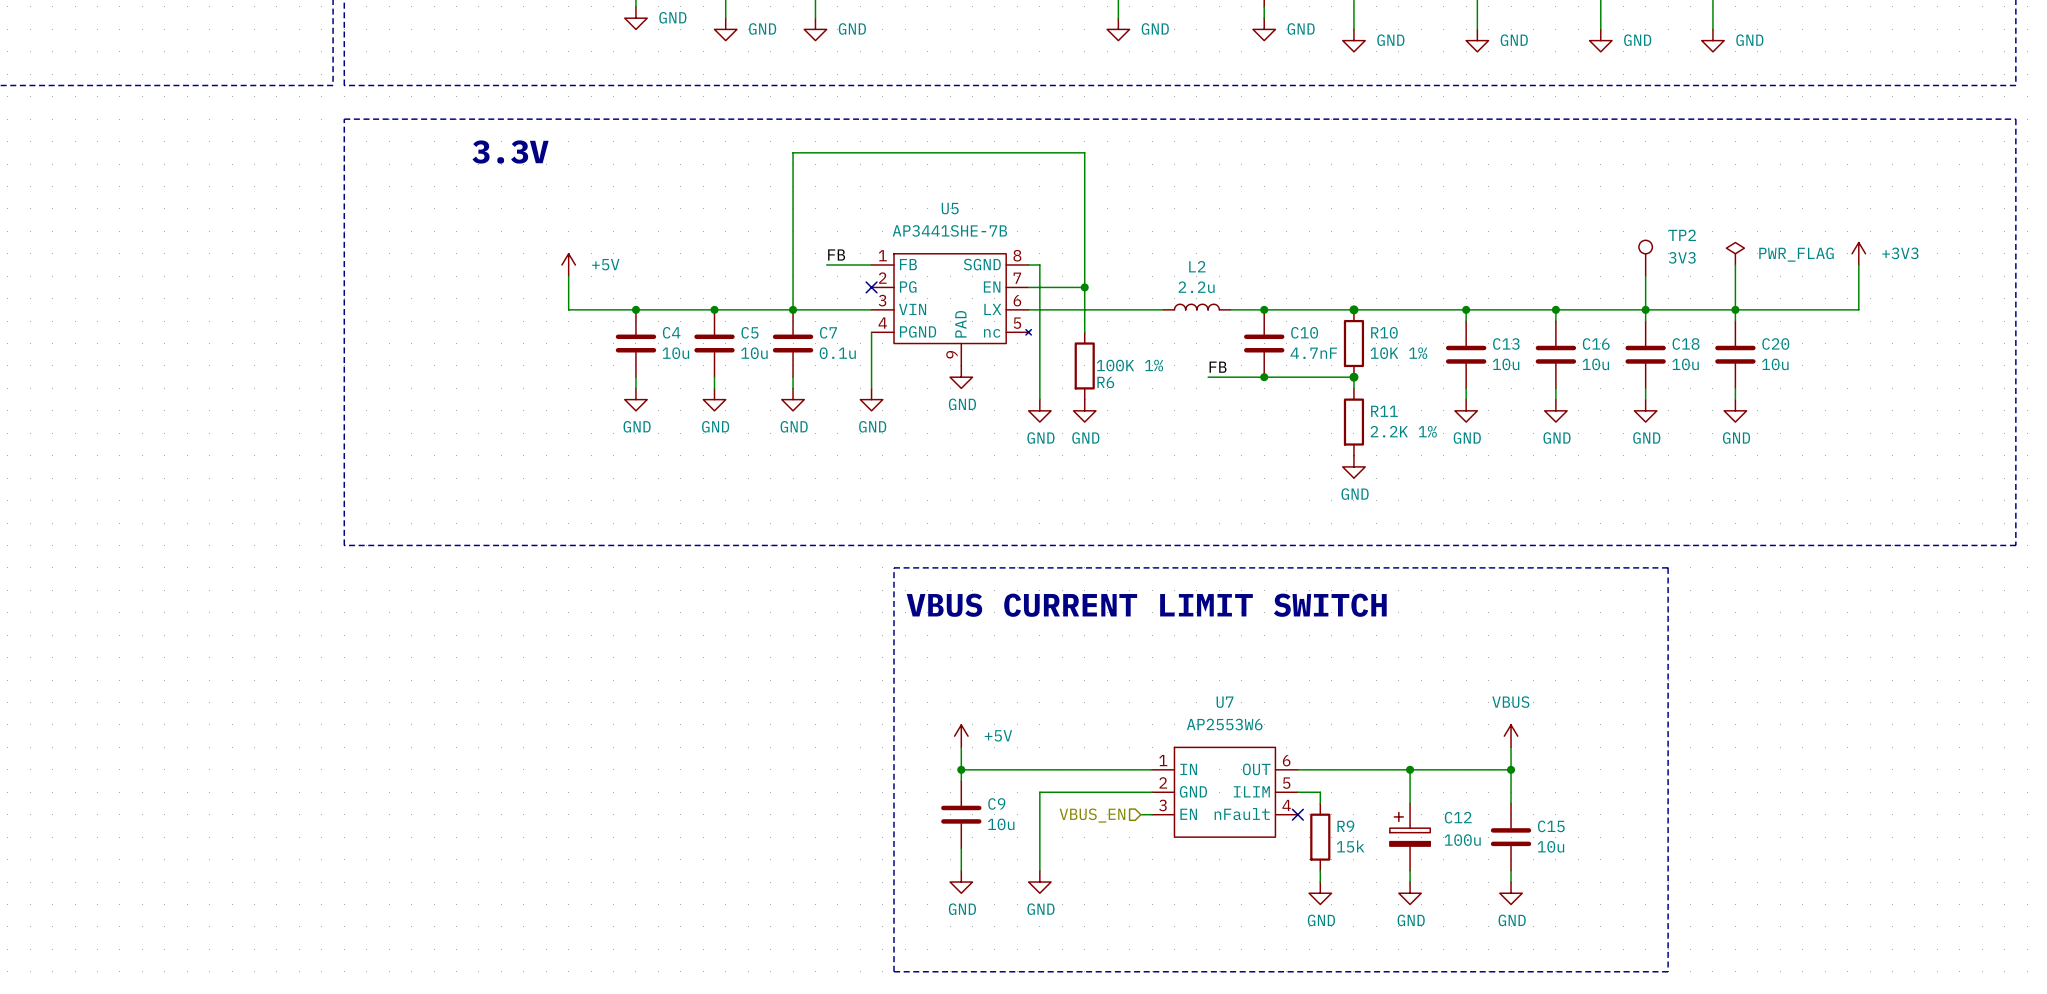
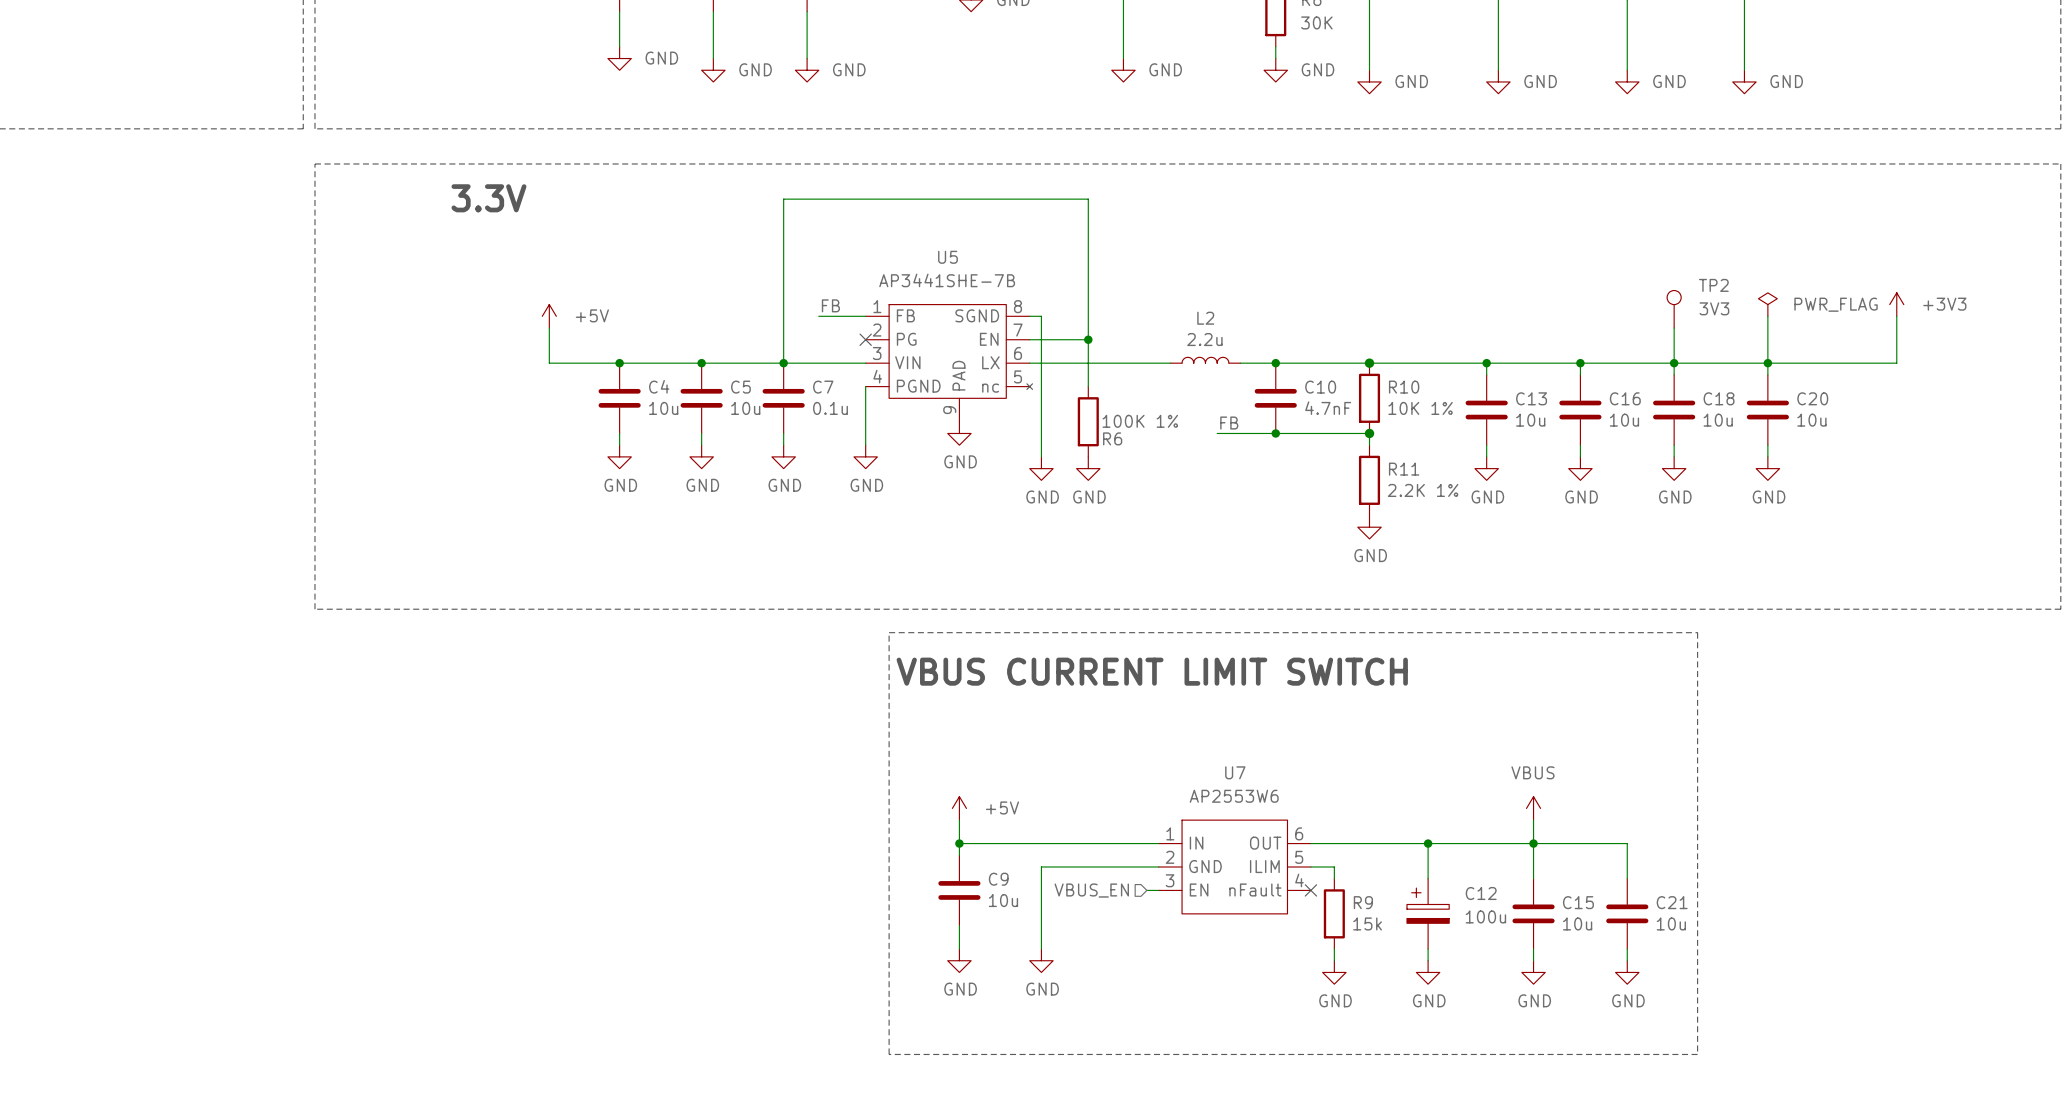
wire: none -> (1533, 843) (1627, 843) (1627, 878)
C21: none -> 10u (1627, 913)
wire: none -> (1627, 949) (1627, 960)
power symbol: none -> GND (1627, 972)

